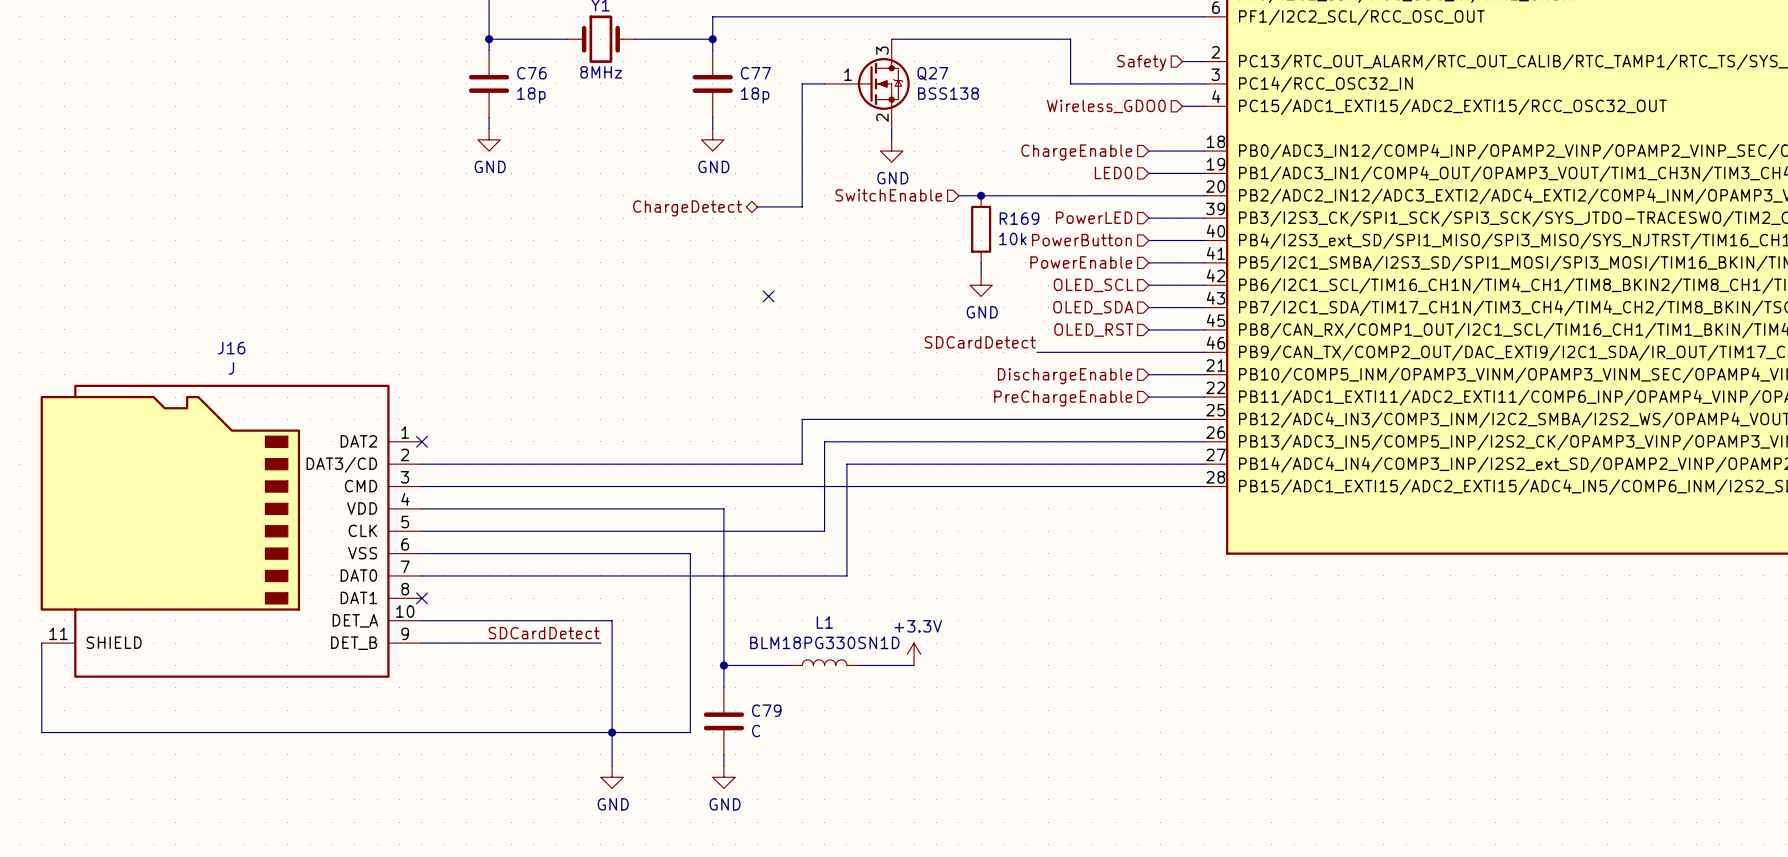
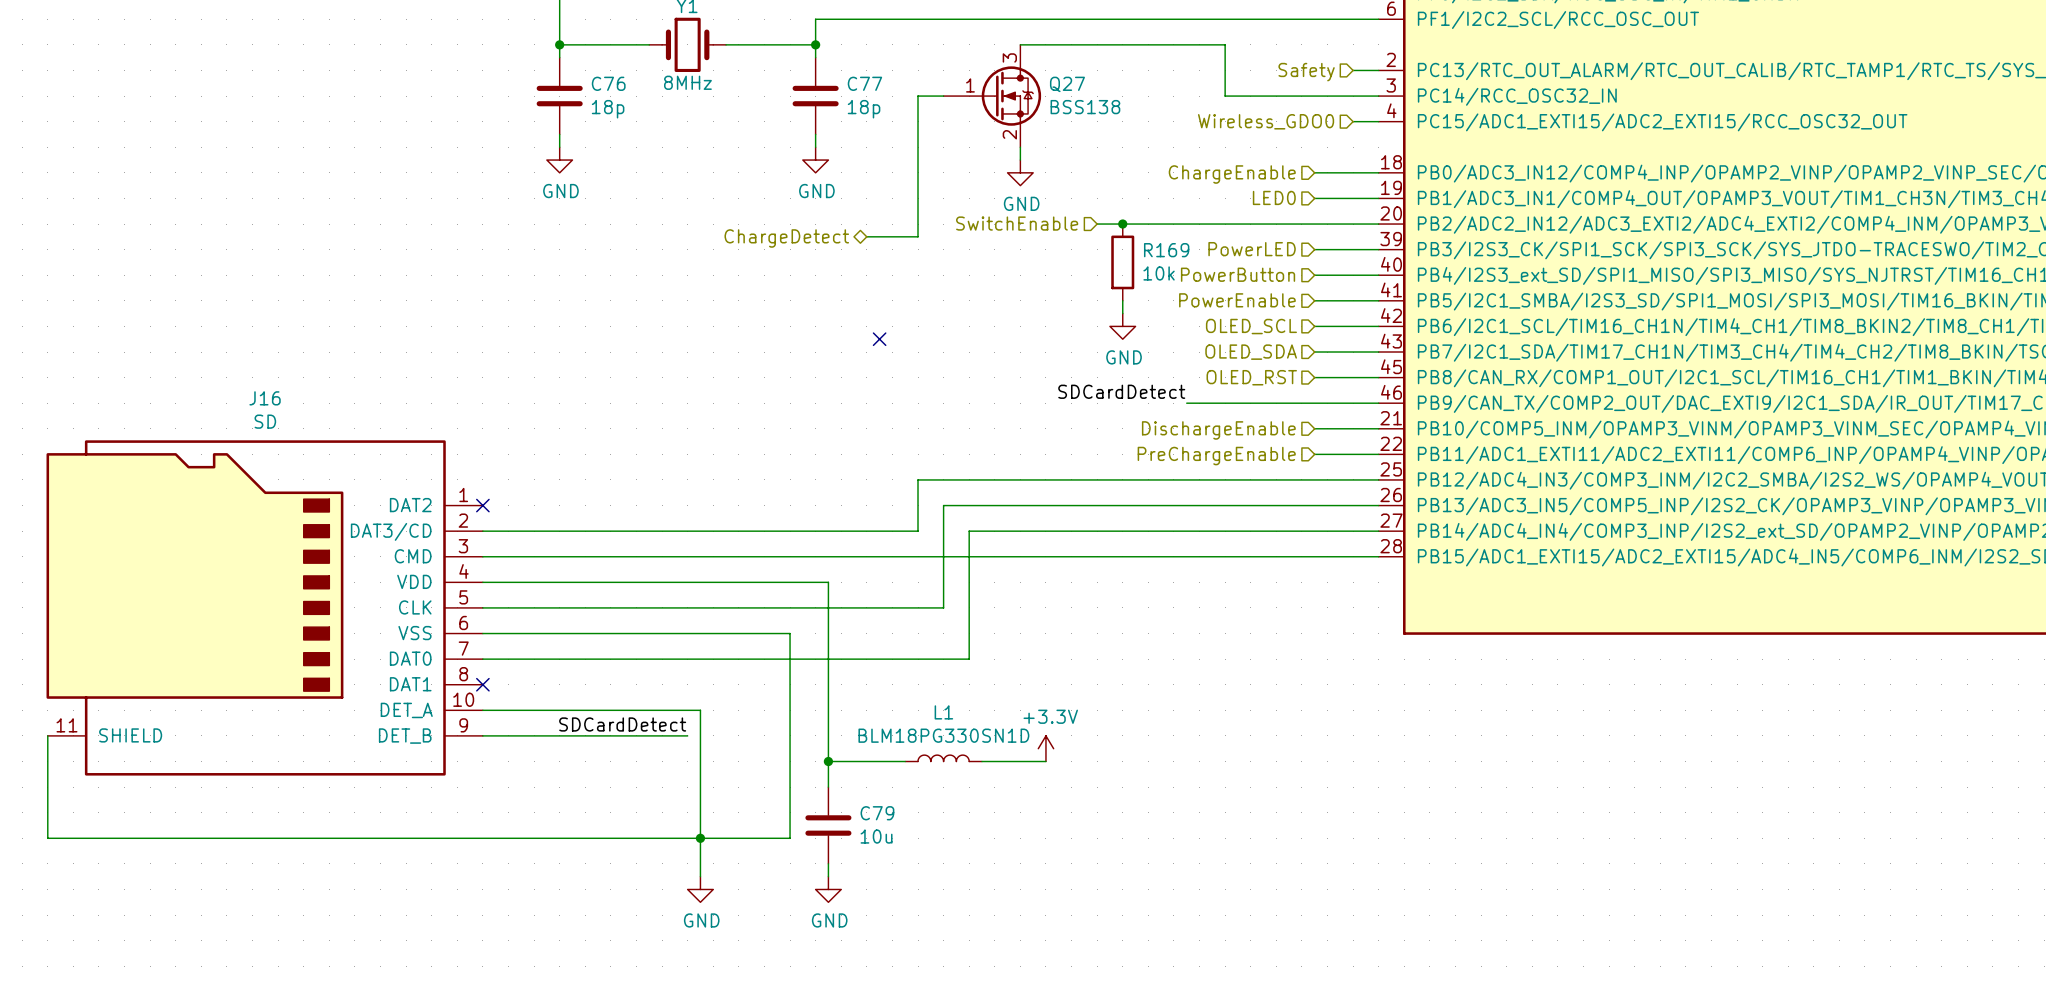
J16 value: J (231, 368) -> SD (265, 421)
C79 value: C (756, 731) -> 10u (876, 836)

